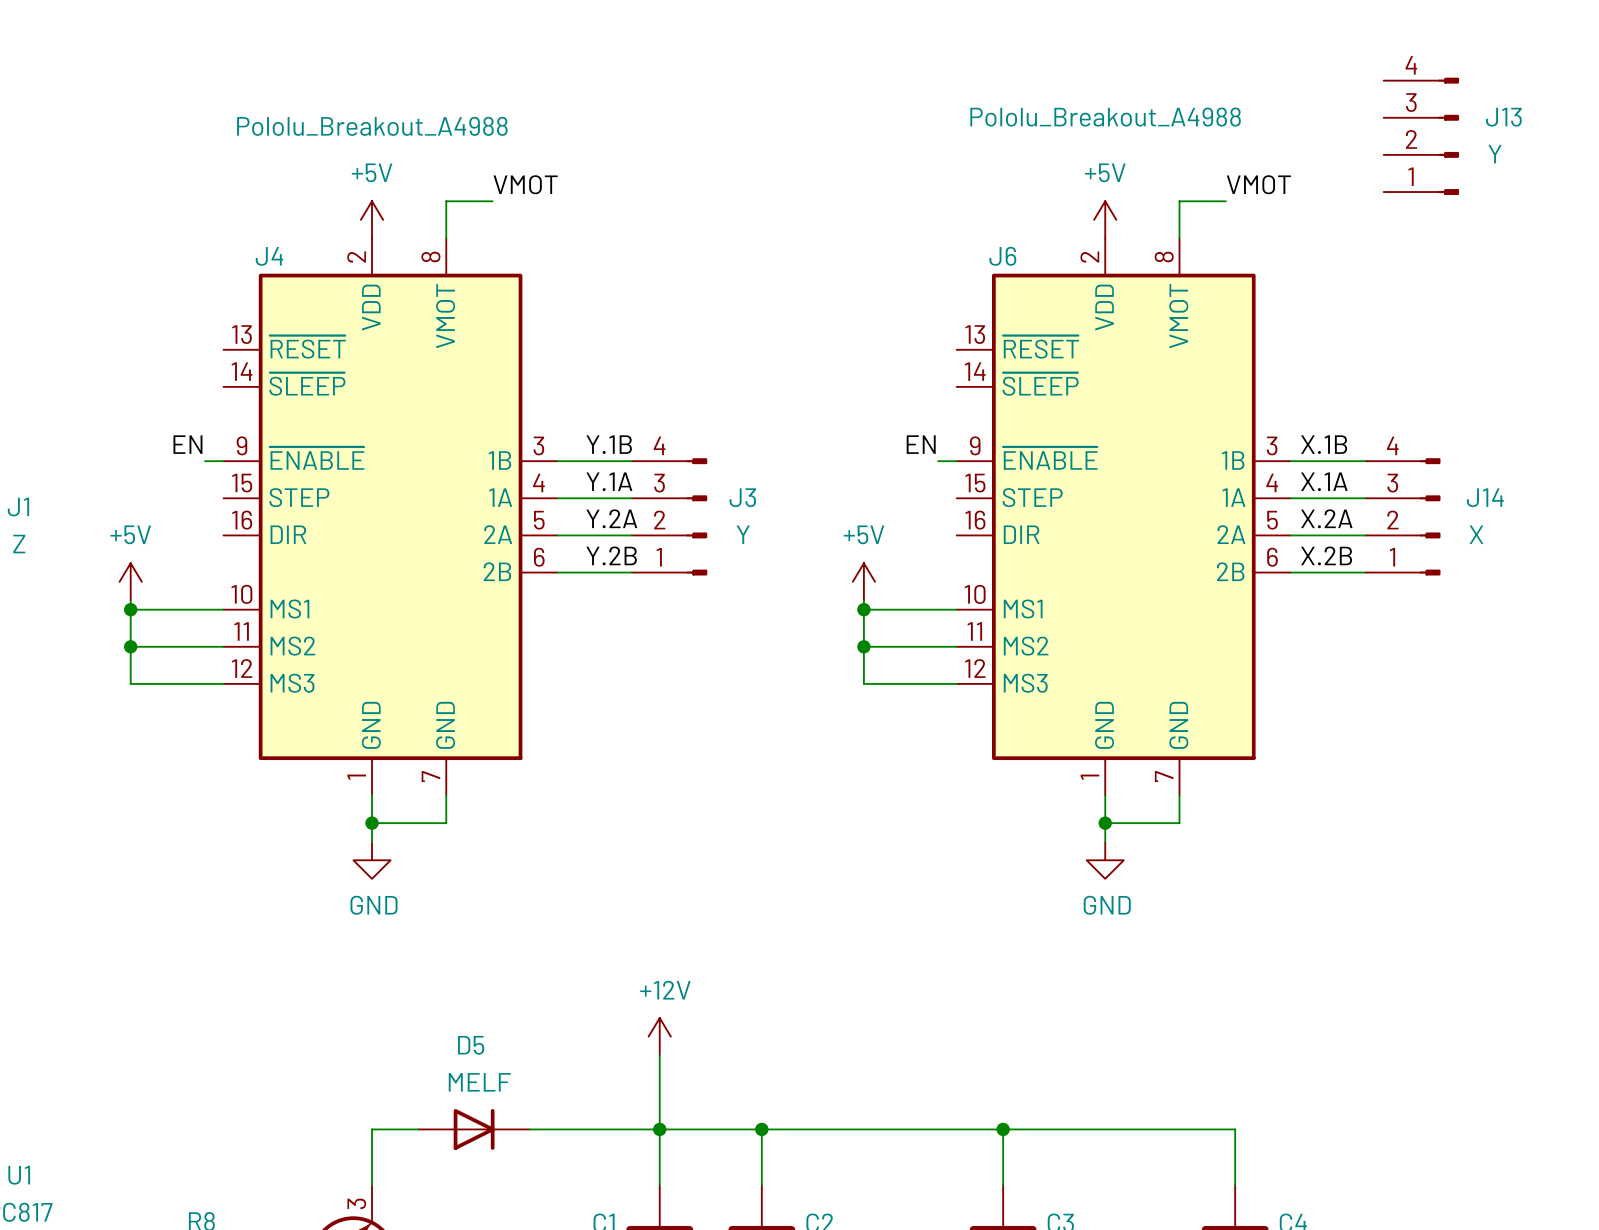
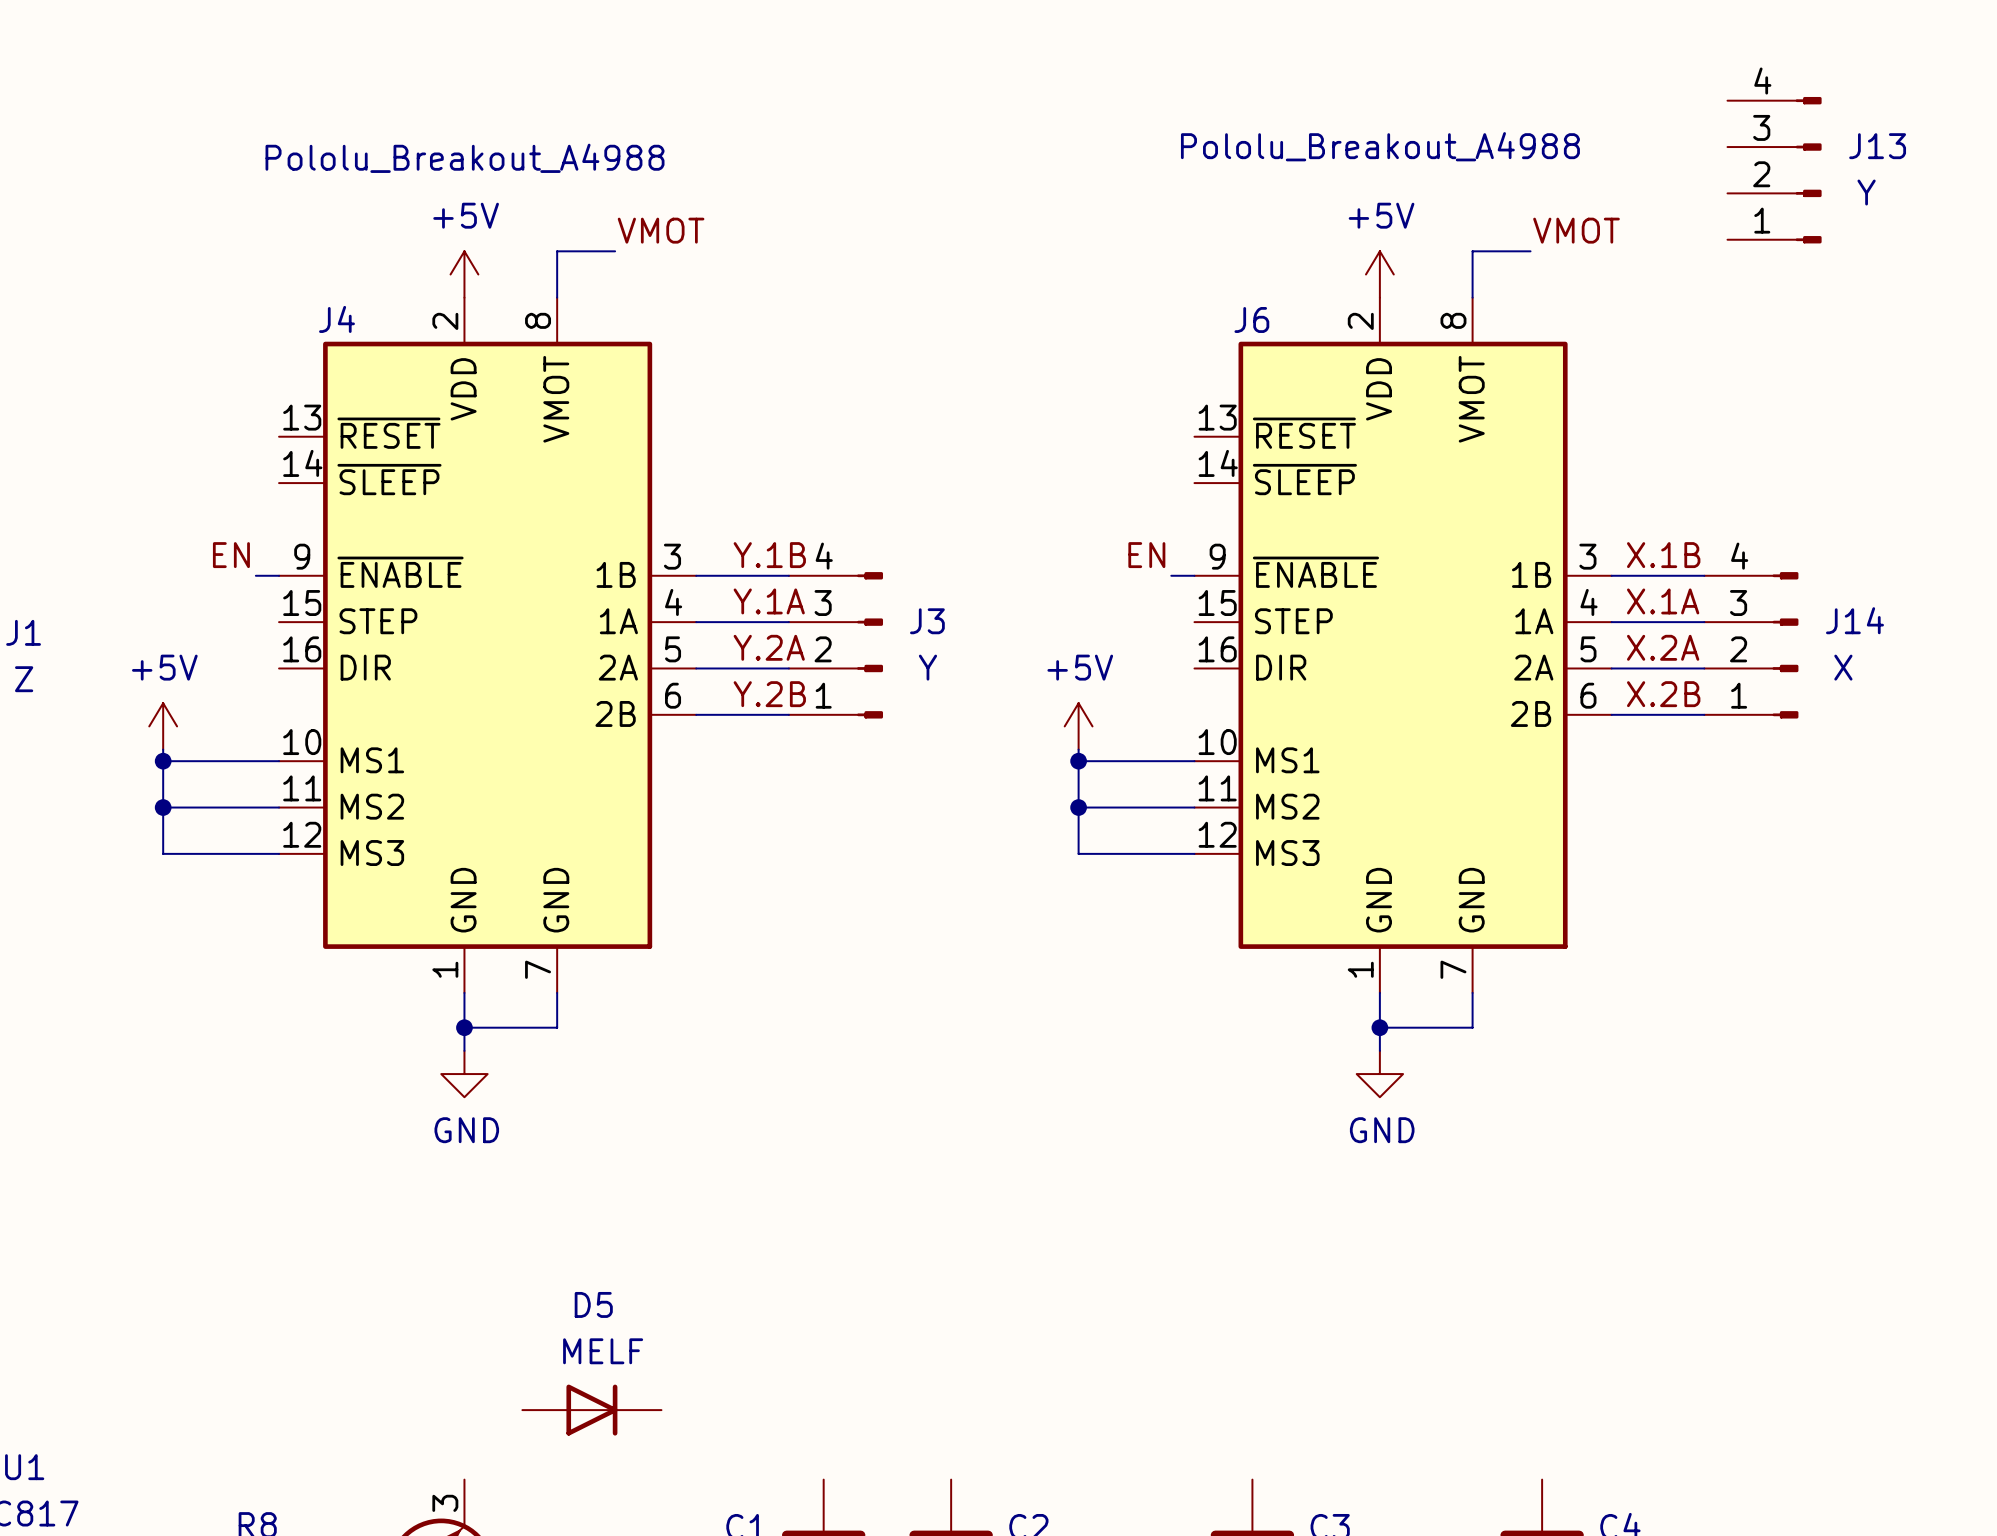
power symbol: +12V (659, 1036) -> none
wire: (659, 1055) (659, 1185) -> none
wire: (418, 1129) (372, 1129) (372, 1185) -> none
wire: (529, 1129) (1235, 1129) (1235, 1185) -> none
junction: (659, 1129) -> none
wire: (761, 1129) (761, 1185) -> none
junction: (761, 1129) -> none
wire: (1003, 1129) (1003, 1185) -> none
junction: (1003, 1129) -> none

